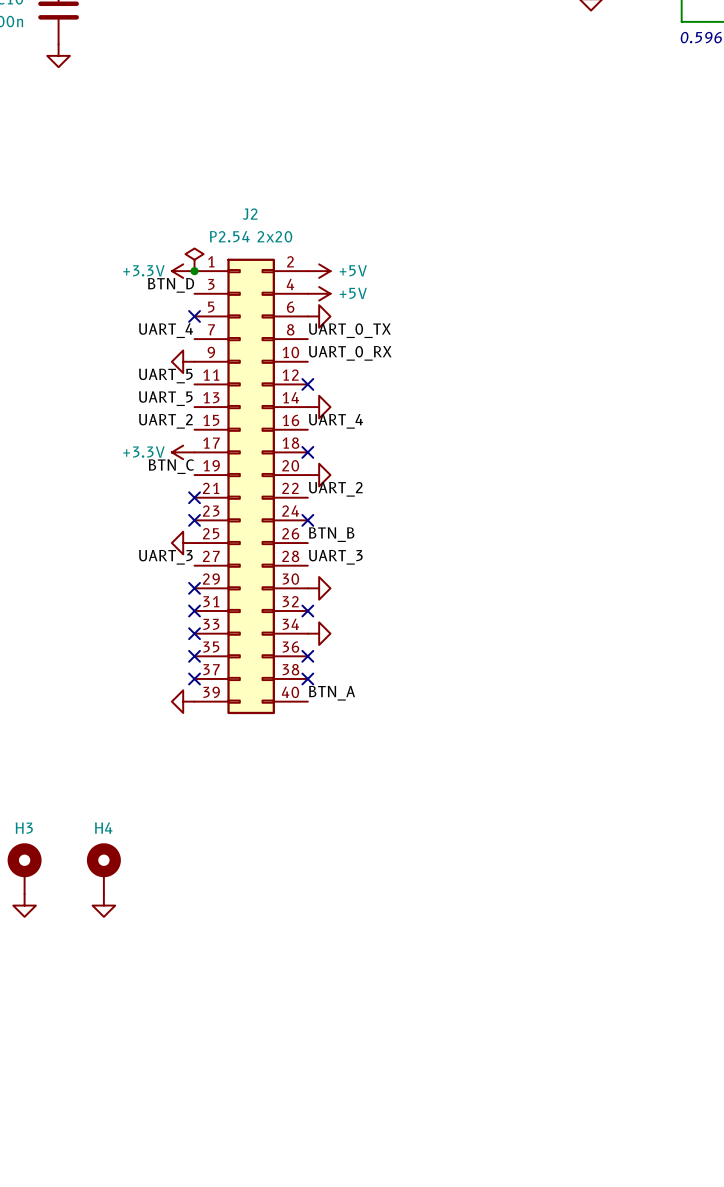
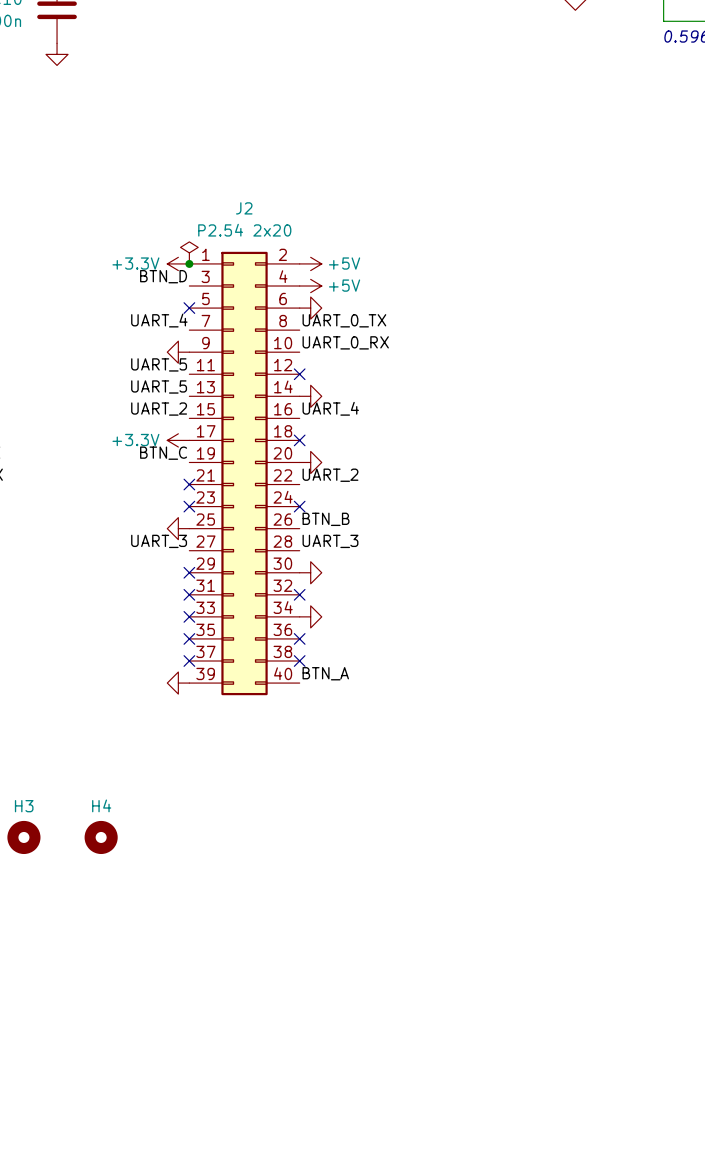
H3 symbol: [7, 843, 42, 895] -> [7, 820, 41, 855]
H4 symbol: [86, 843, 121, 895] -> [84, 820, 118, 855]
power symbol: (24, 905) -> none
power symbol: (103, 905) -> none

